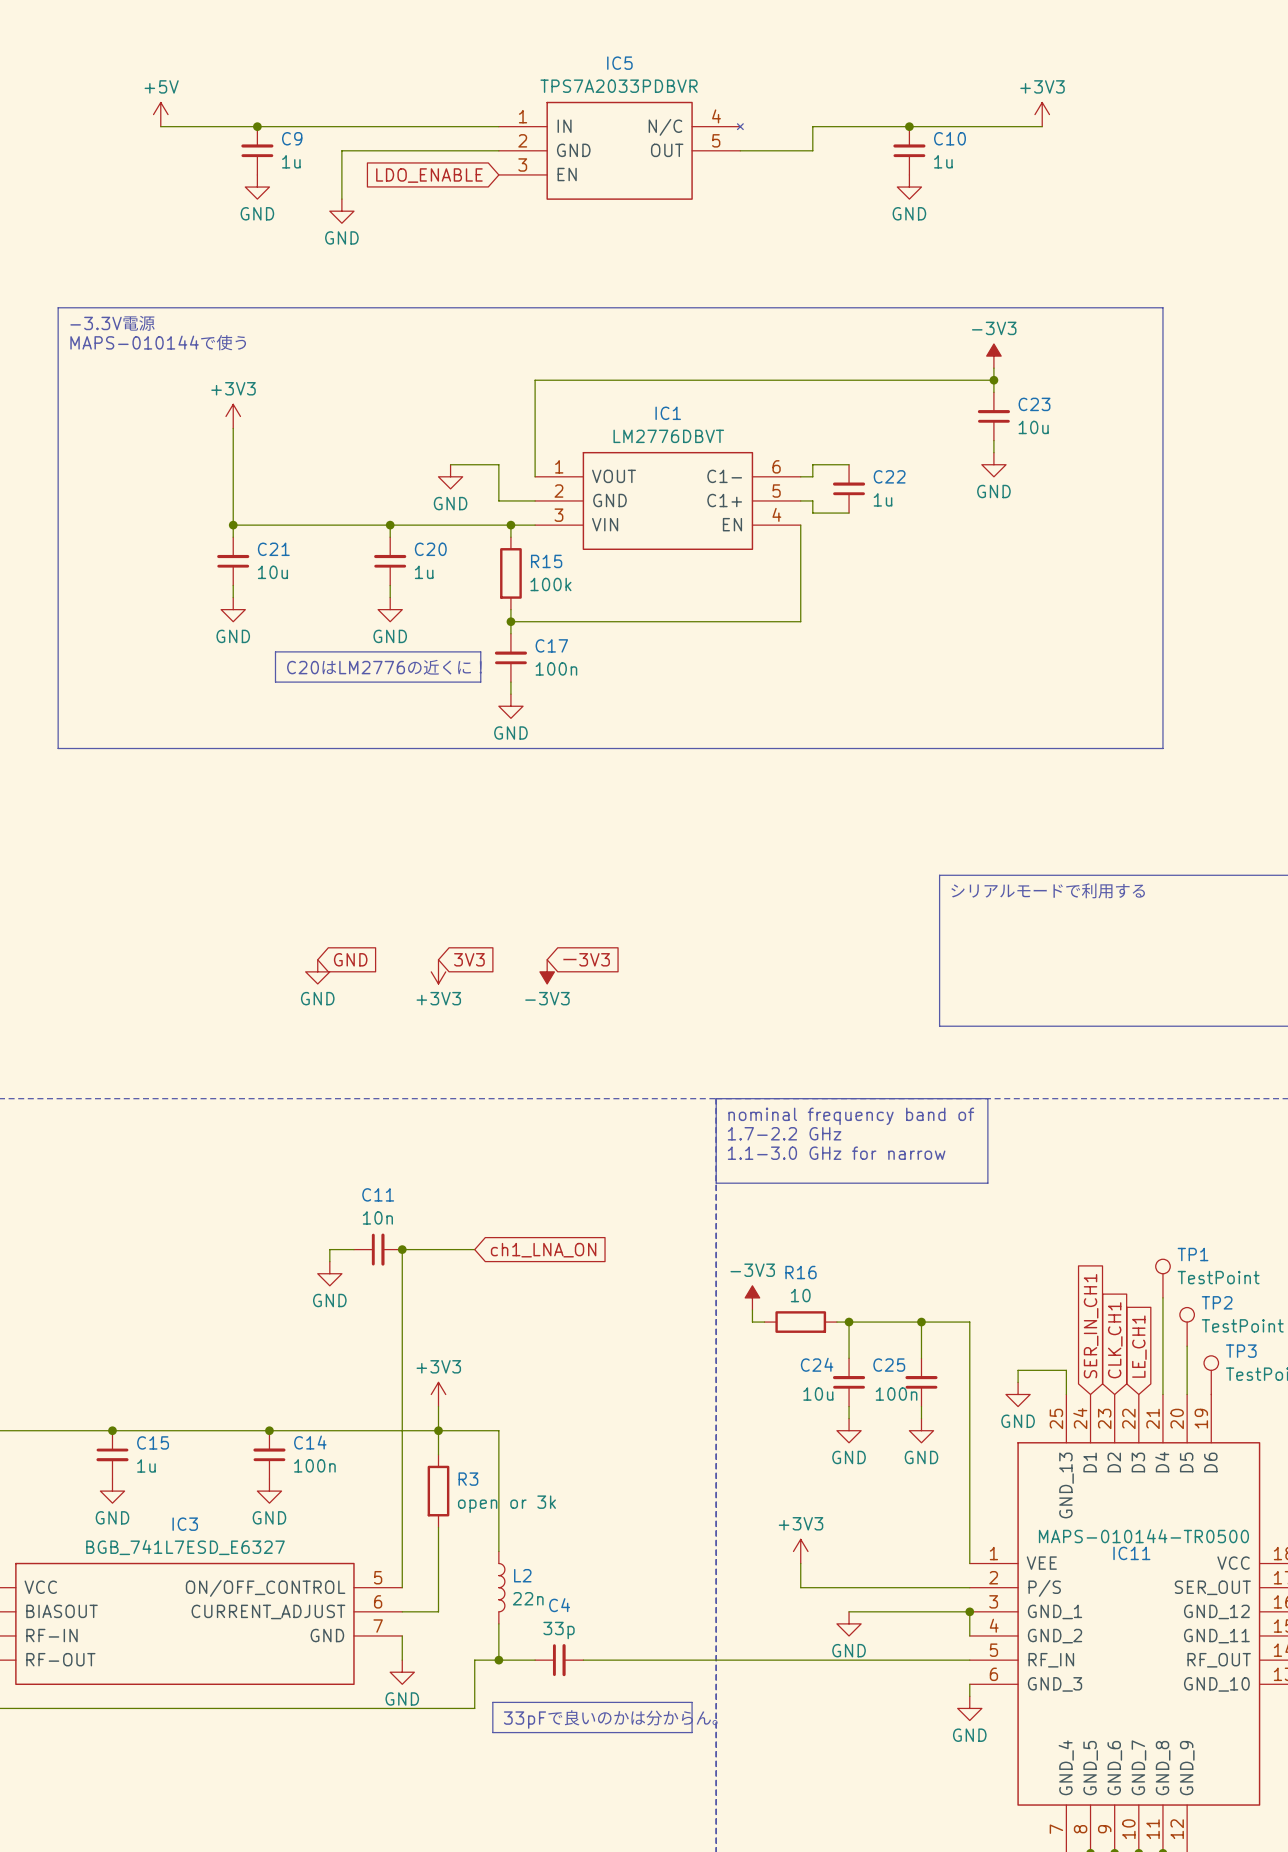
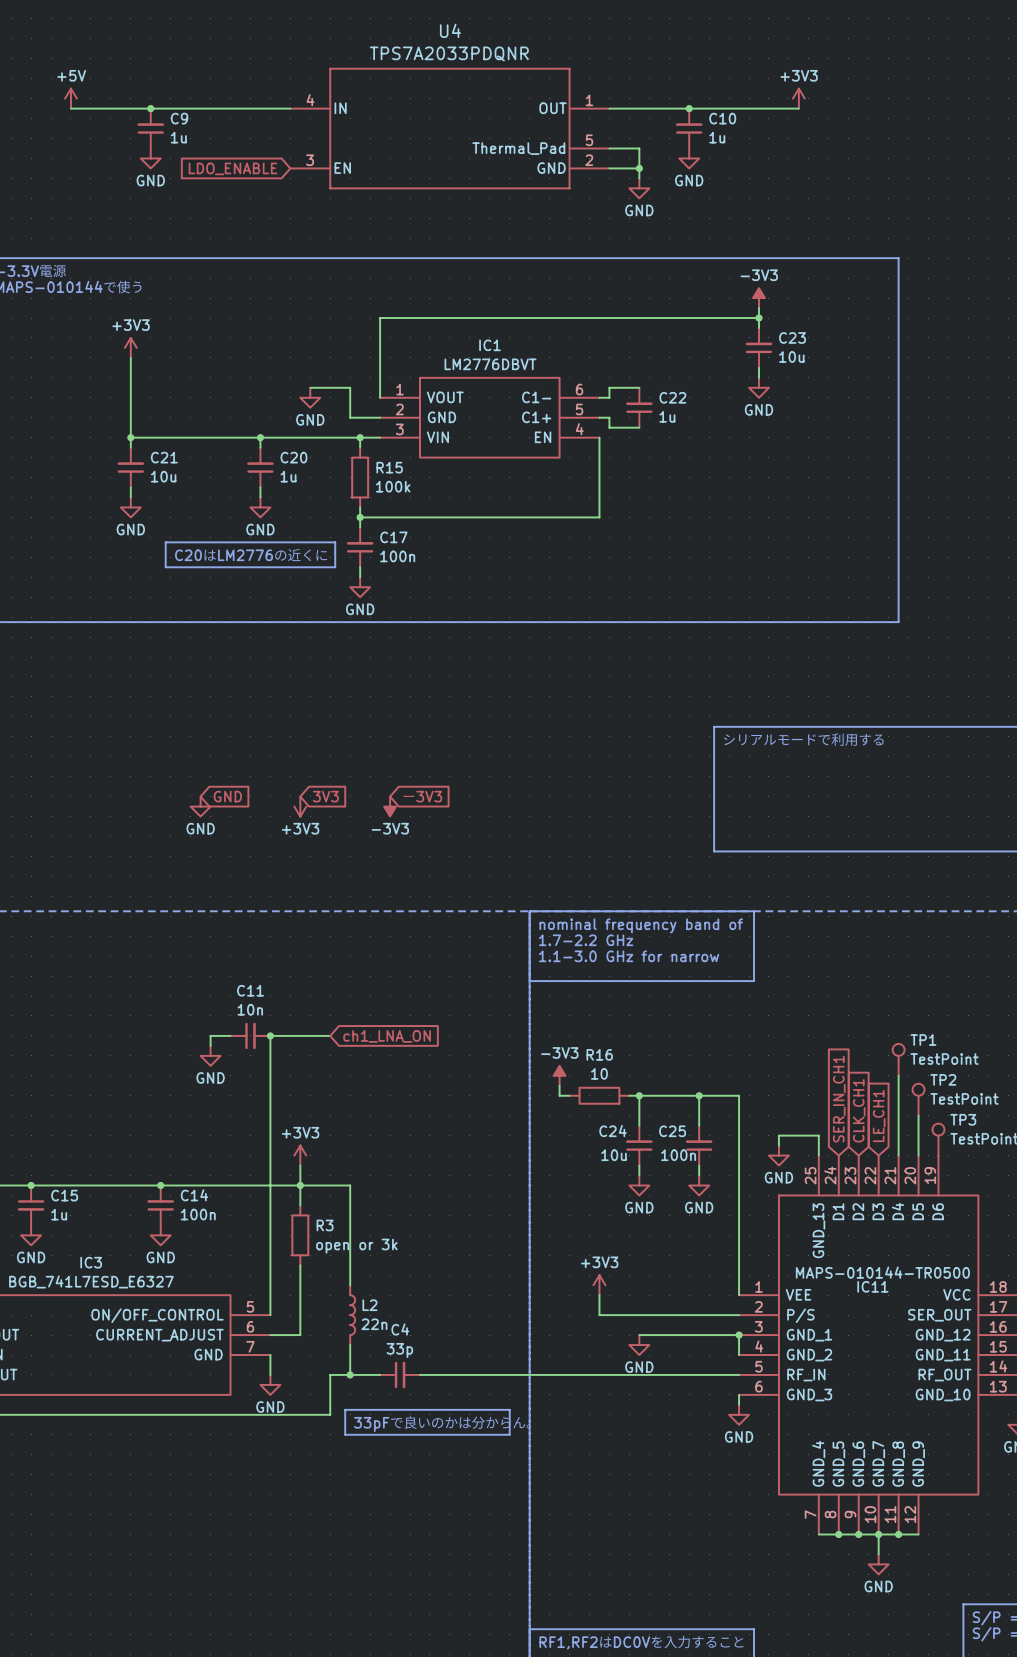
wire: (812, 126) (812, 150) (740, 150) -> none
wire: (498, 150) (341, 150) (341, 199) -> none
U4: none -> TPS7A2033PDQNR (449, 128)
IC5: TPS7A2033PDBVR (621, 150) -> none
wire: none -> (609, 148) (639, 148) (639, 178)
global label position: LDO_ENABLE (429, 175) -> LDO_ENABLE (233, 168)
wire: none -> (609, 168) (639, 168)
junction: none -> (639, 168)
power symbol: GND (341, 211) -> none
power symbol: none -> GND (639, 188)

